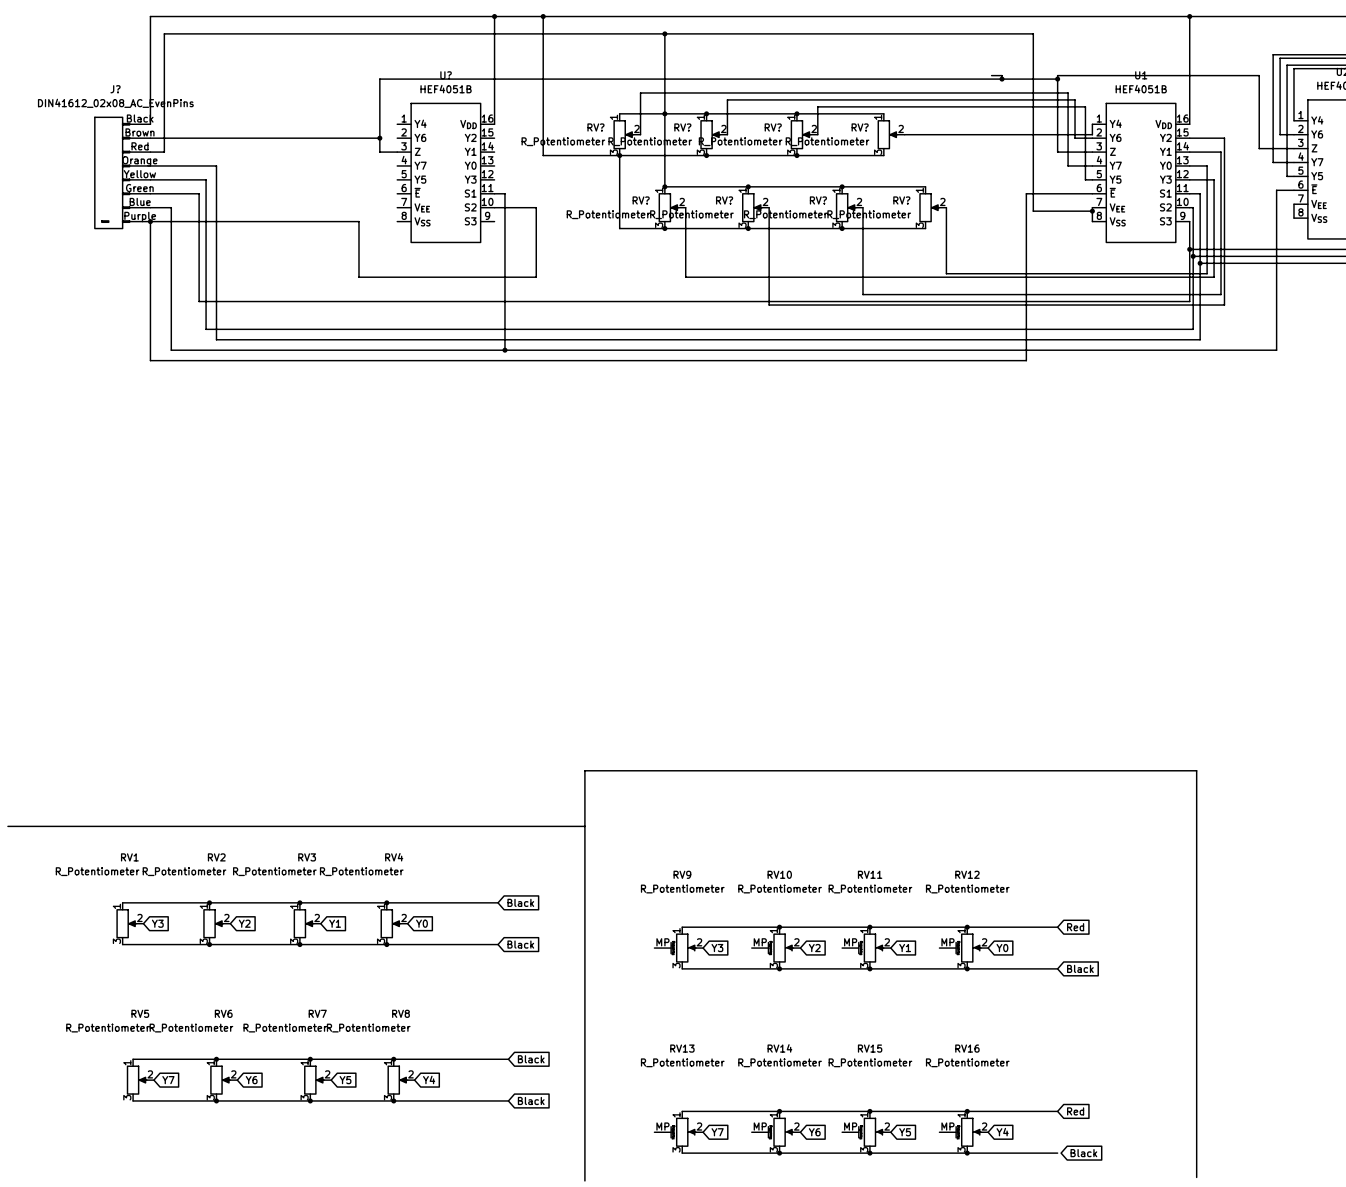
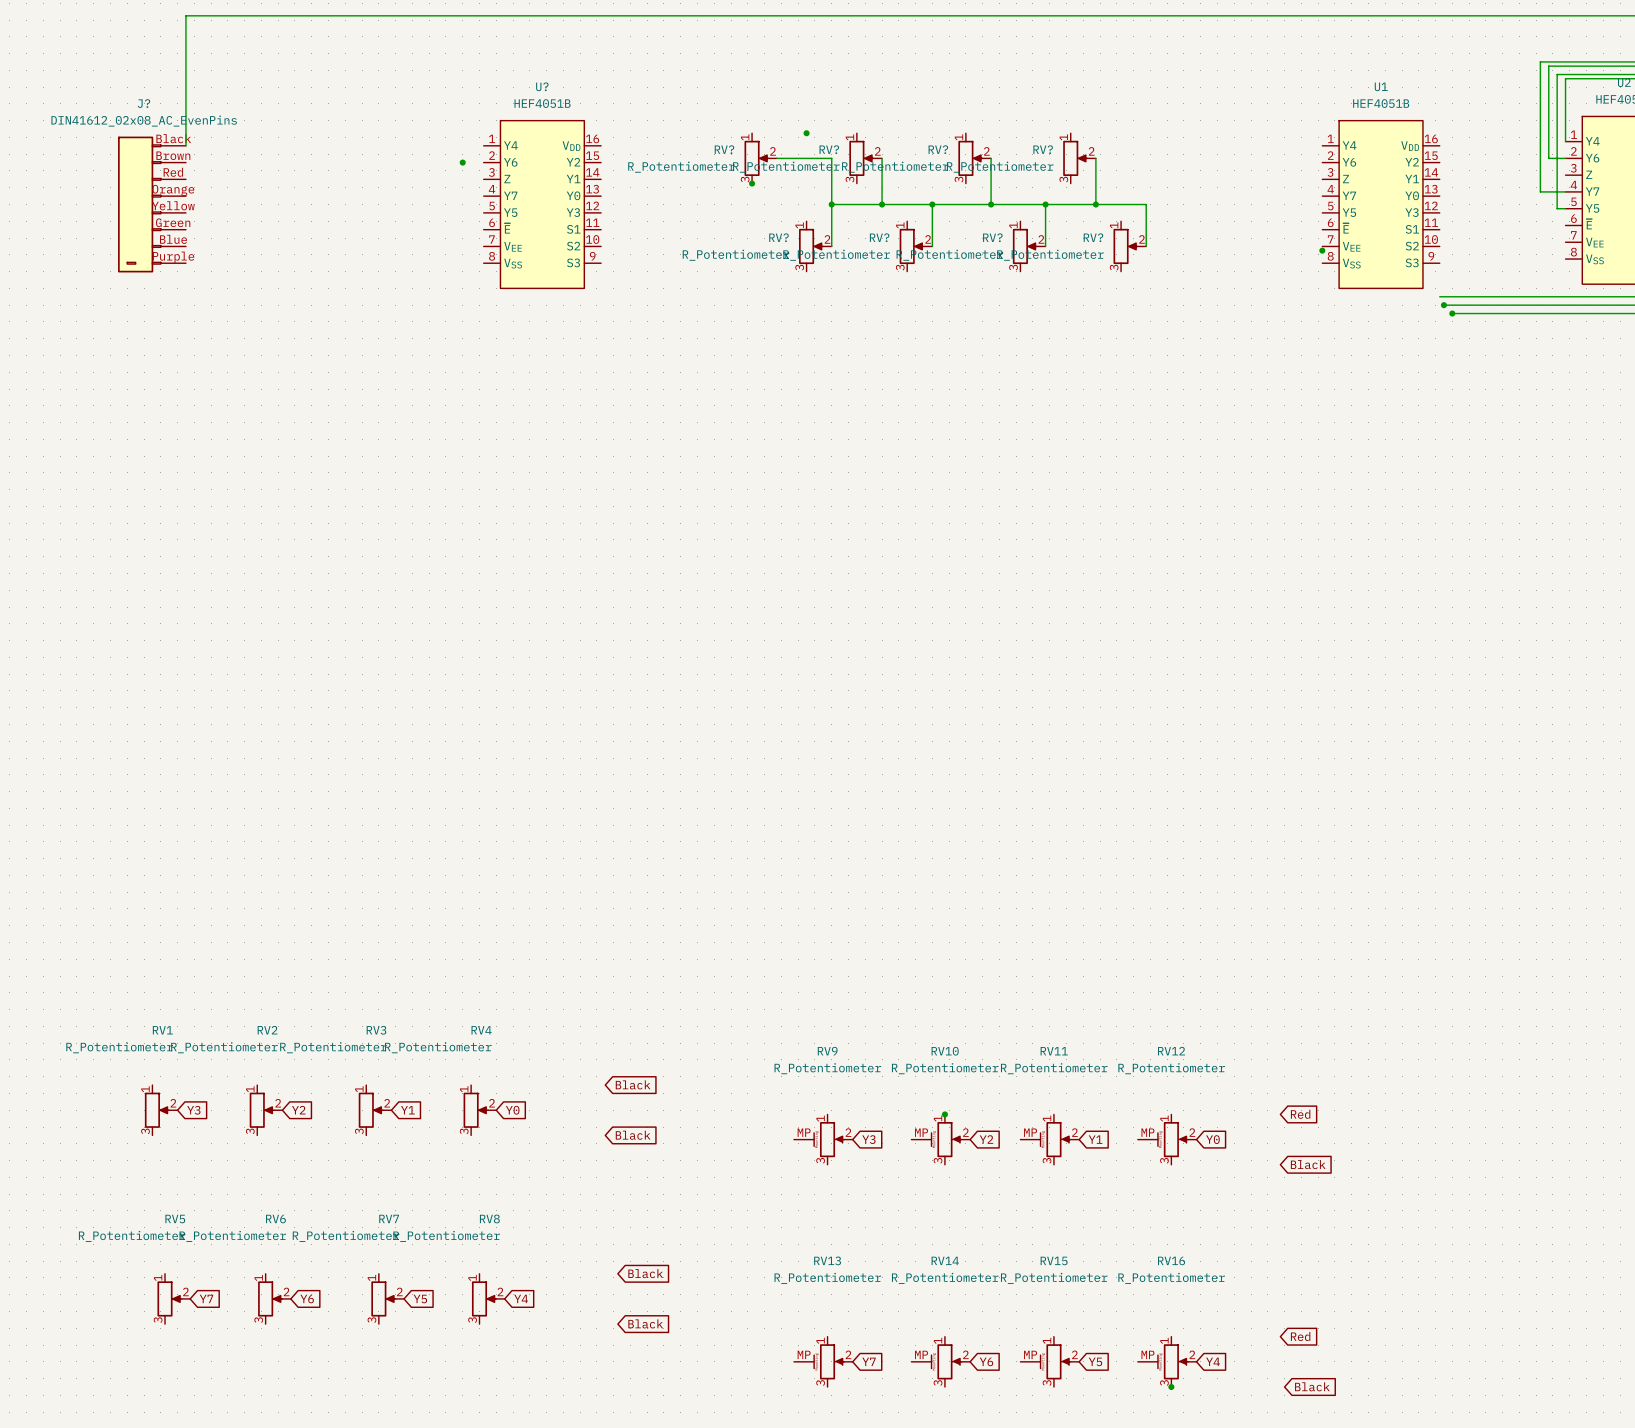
wire: (494, 16) (494, 124) -> none
junction: (494, 16) -> none
wire: (543, 16) (543, 155) (883, 155) -> none
junction: (543, 16) -> none
wire: (1189, 16) (1189, 124) -> none
junction: (1189, 16) -> none
wire: (664, 33) (664, 186) (925, 186) -> none
junction: (664, 33) -> none
wire: (991, 75) (1002, 75) (1002, 79) -> none
junction: (1002, 79) -> none
wire: (1057, 79) (379, 79) (379, 152) (397, 152) -> none
junction: (1057, 79) -> none
wire: (619, 113) (883, 113) -> none
junction: (706, 113) -> none
junction: (796, 113) -> none
wire: (1092, 124) (1092, 134) (904, 134) -> (1095, 204) (1095, 158)
wire: (640, 134) (640, 92) (1068, 92) (1068, 165) (1092, 165) -> (777, 158) (831, 158) (831, 246)
wire: (727, 134) (727, 99) (1075, 99) (1075, 138) (1092, 138) -> (882, 158) (882, 204)
wire: (817, 134) (817, 106) (1085, 106) (1085, 179) (1092, 179) -> (991, 158) (991, 204)
wire: (150, 138) (379, 138) -> none
wire: (1189, 138) (1224, 138) (1224, 305) (769, 305) (769, 207) -> (932, 204) (932, 246)
wire: (1293, 148) (1259, 148) (1259, 75) (1057, 75) (1057, 152) (1092, 152) -> none
wire: (150, 152) (164, 152) (164, 33) (1033, 33) (1033, 211) (1092, 211) -> none
wire: (1189, 152) (1221, 152) (1221, 294) (862, 294) (862, 207) -> (1045, 204) (1045, 246)
wire: (619, 155) (619, 228) (925, 228) -> none
junction: (706, 155) -> none
junction: (796, 155) -> none
wire: (150, 165) (216, 165) (216, 339) (1200, 339) (1200, 193) (1189, 193) -> none
wire: (1189, 165) (1207, 165) (1207, 273) (946, 273) (946, 207) -> (831, 204) (1146, 204) (1146, 246)
junction: none -> (831, 204)
junction: none -> (882, 204)
junction: none -> (932, 204)
junction: none -> (991, 204)
junction: none -> (1045, 204)
junction: none -> (1095, 204)
wire: (150, 179) (206, 179) (206, 329) (1193, 329) (1193, 207) (1189, 207) -> none
wire: (1189, 179) (1214, 179) (1214, 277) (685, 277) (685, 207) -> none
junction: (664, 186) -> none
junction: (748, 186) -> none
junction: (842, 186) -> none
wire: (1293, 190) (1276, 190) (1276, 350) (171, 350) (171, 207) (150, 207) -> none
wire: (150, 193) (199, 193) (199, 301) (1189, 301) (1189, 221) -> none
wire: (494, 193) (504, 193) (504, 350) -> none
wire: (1092, 193) (1026, 193) (1026, 360) (150, 360) (150, 221) (358, 221) (358, 277) (536, 277) (536, 207) (494, 207) -> none
wire: (1293, 204) (1293, 218) -> none
wire: (1092, 207) (1092, 221) -> none
junction: (150, 221) -> none
junction: (664, 228) -> none
junction: (748, 228) -> none
junction: (842, 228) -> none
junction: (1189, 249) -> none
junction: (504, 350) -> none
line: (7, 826) (584, 826) -> none
wire: (122, 902) (498, 902) -> none
junction: (209, 902) -> none
junction: (299, 902) -> none
junction: (386, 902) -> none
wire: (682, 927) (1057, 927) -> none
junction: (869, 927) -> none
junction: (967, 927) -> none
wire: (122, 944) (498, 944) -> none
junction: (209, 944) -> none
junction: (299, 944) -> none
junction: (386, 944) -> none
wire: (682, 968) (1057, 968) -> none
junction: (779, 968) -> none
junction: (869, 968) -> none
junction: (967, 968) -> none
wire: (133, 1059) (508, 1059) -> none
junction: (216, 1059) -> none
junction: (310, 1059) -> none
junction: (393, 1059) -> none
wire: (133, 1100) (508, 1100) -> none
junction: (216, 1100) -> none
junction: (310, 1100) -> none
junction: (393, 1100) -> none
wire: (682, 1111) (1057, 1111) -> none
junction: (779, 1111) -> none
junction: (869, 1111) -> none
junction: (967, 1111) -> none
wire: (682, 1153) (1057, 1153) -> none
junction: (779, 1153) -> none
junction: (869, 1153) -> none
line: (1196, 1177) (1196, 770) (584, 770) (584, 1180) -> none

